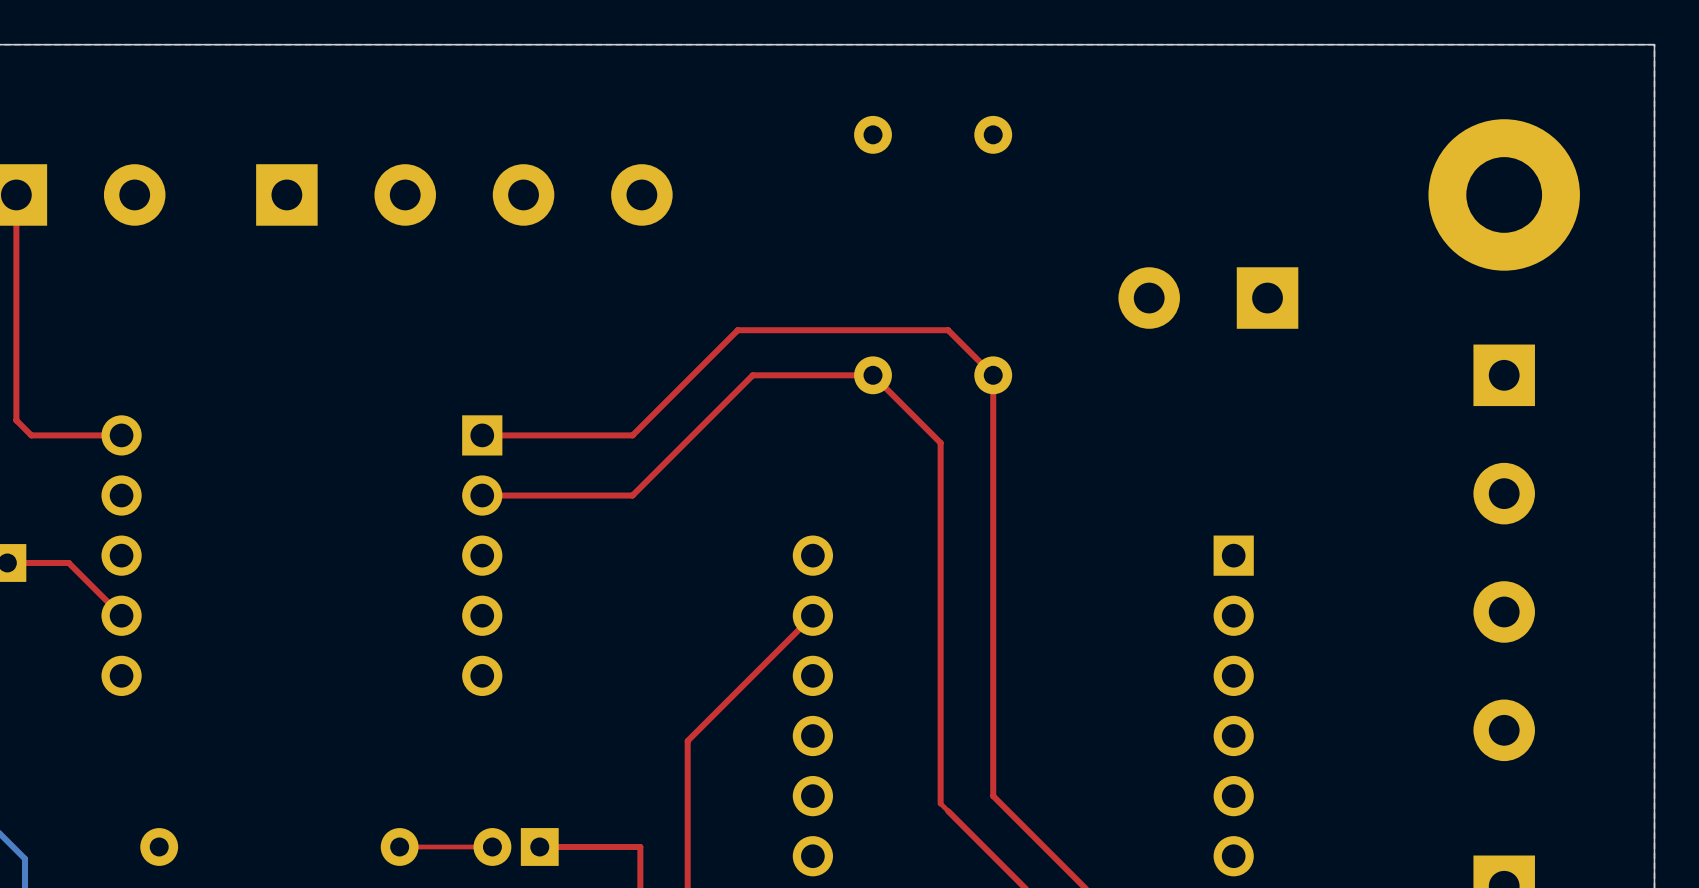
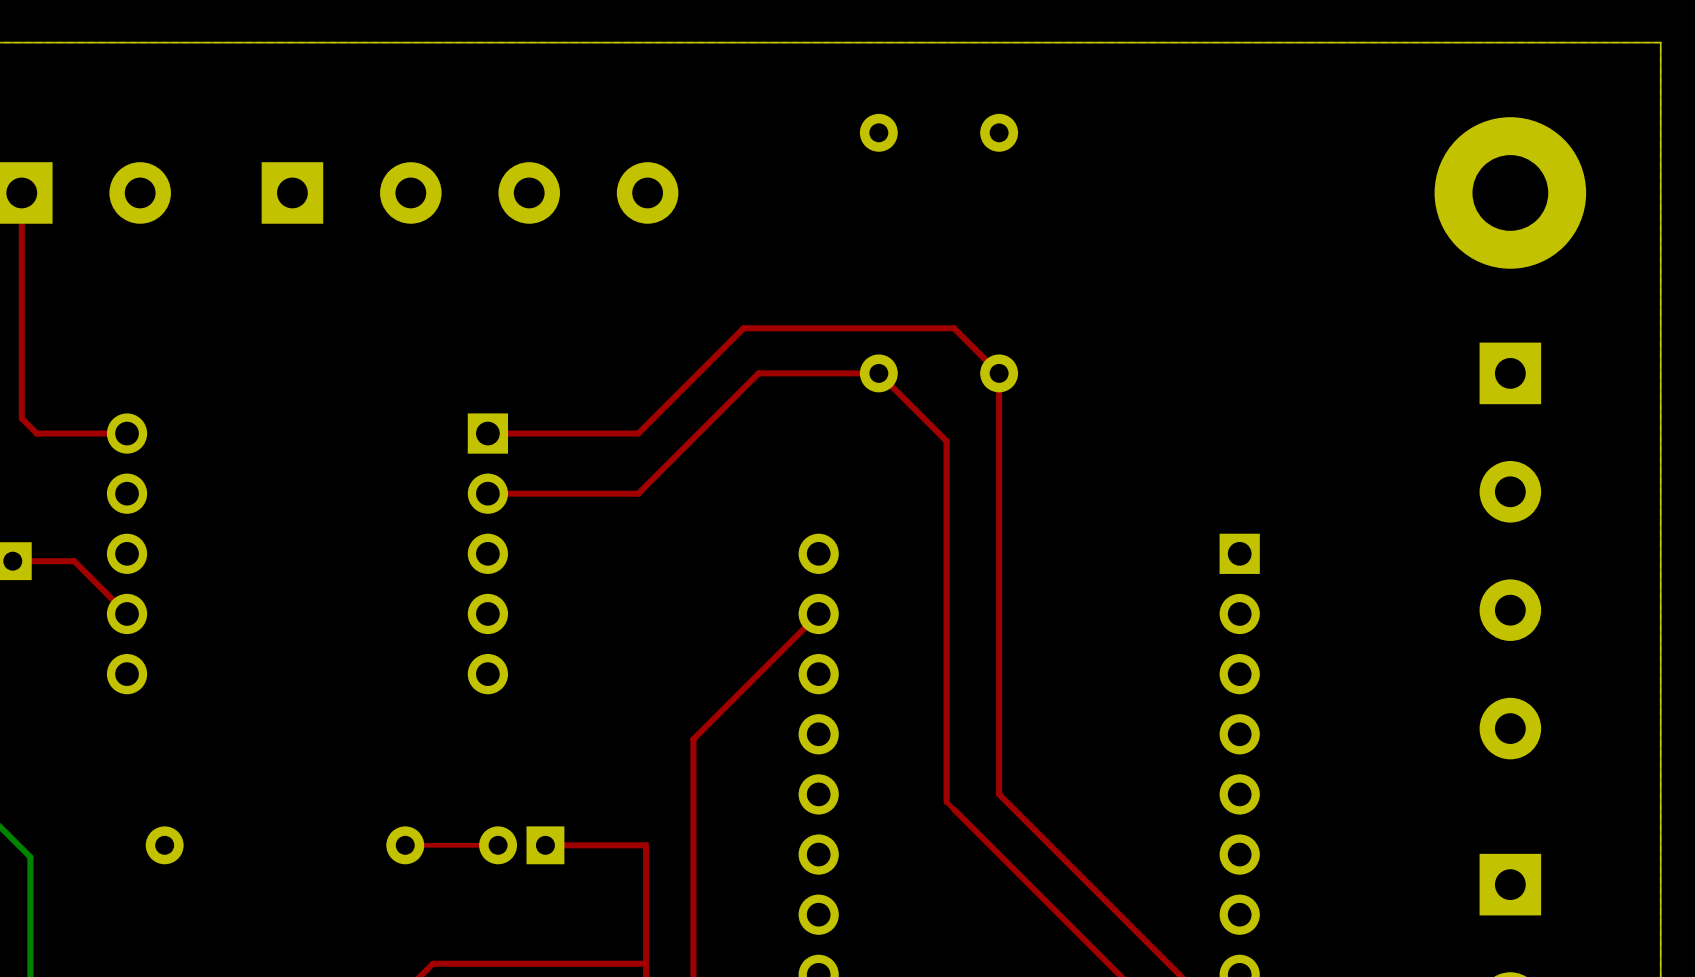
part: (1208, 298) -> none

